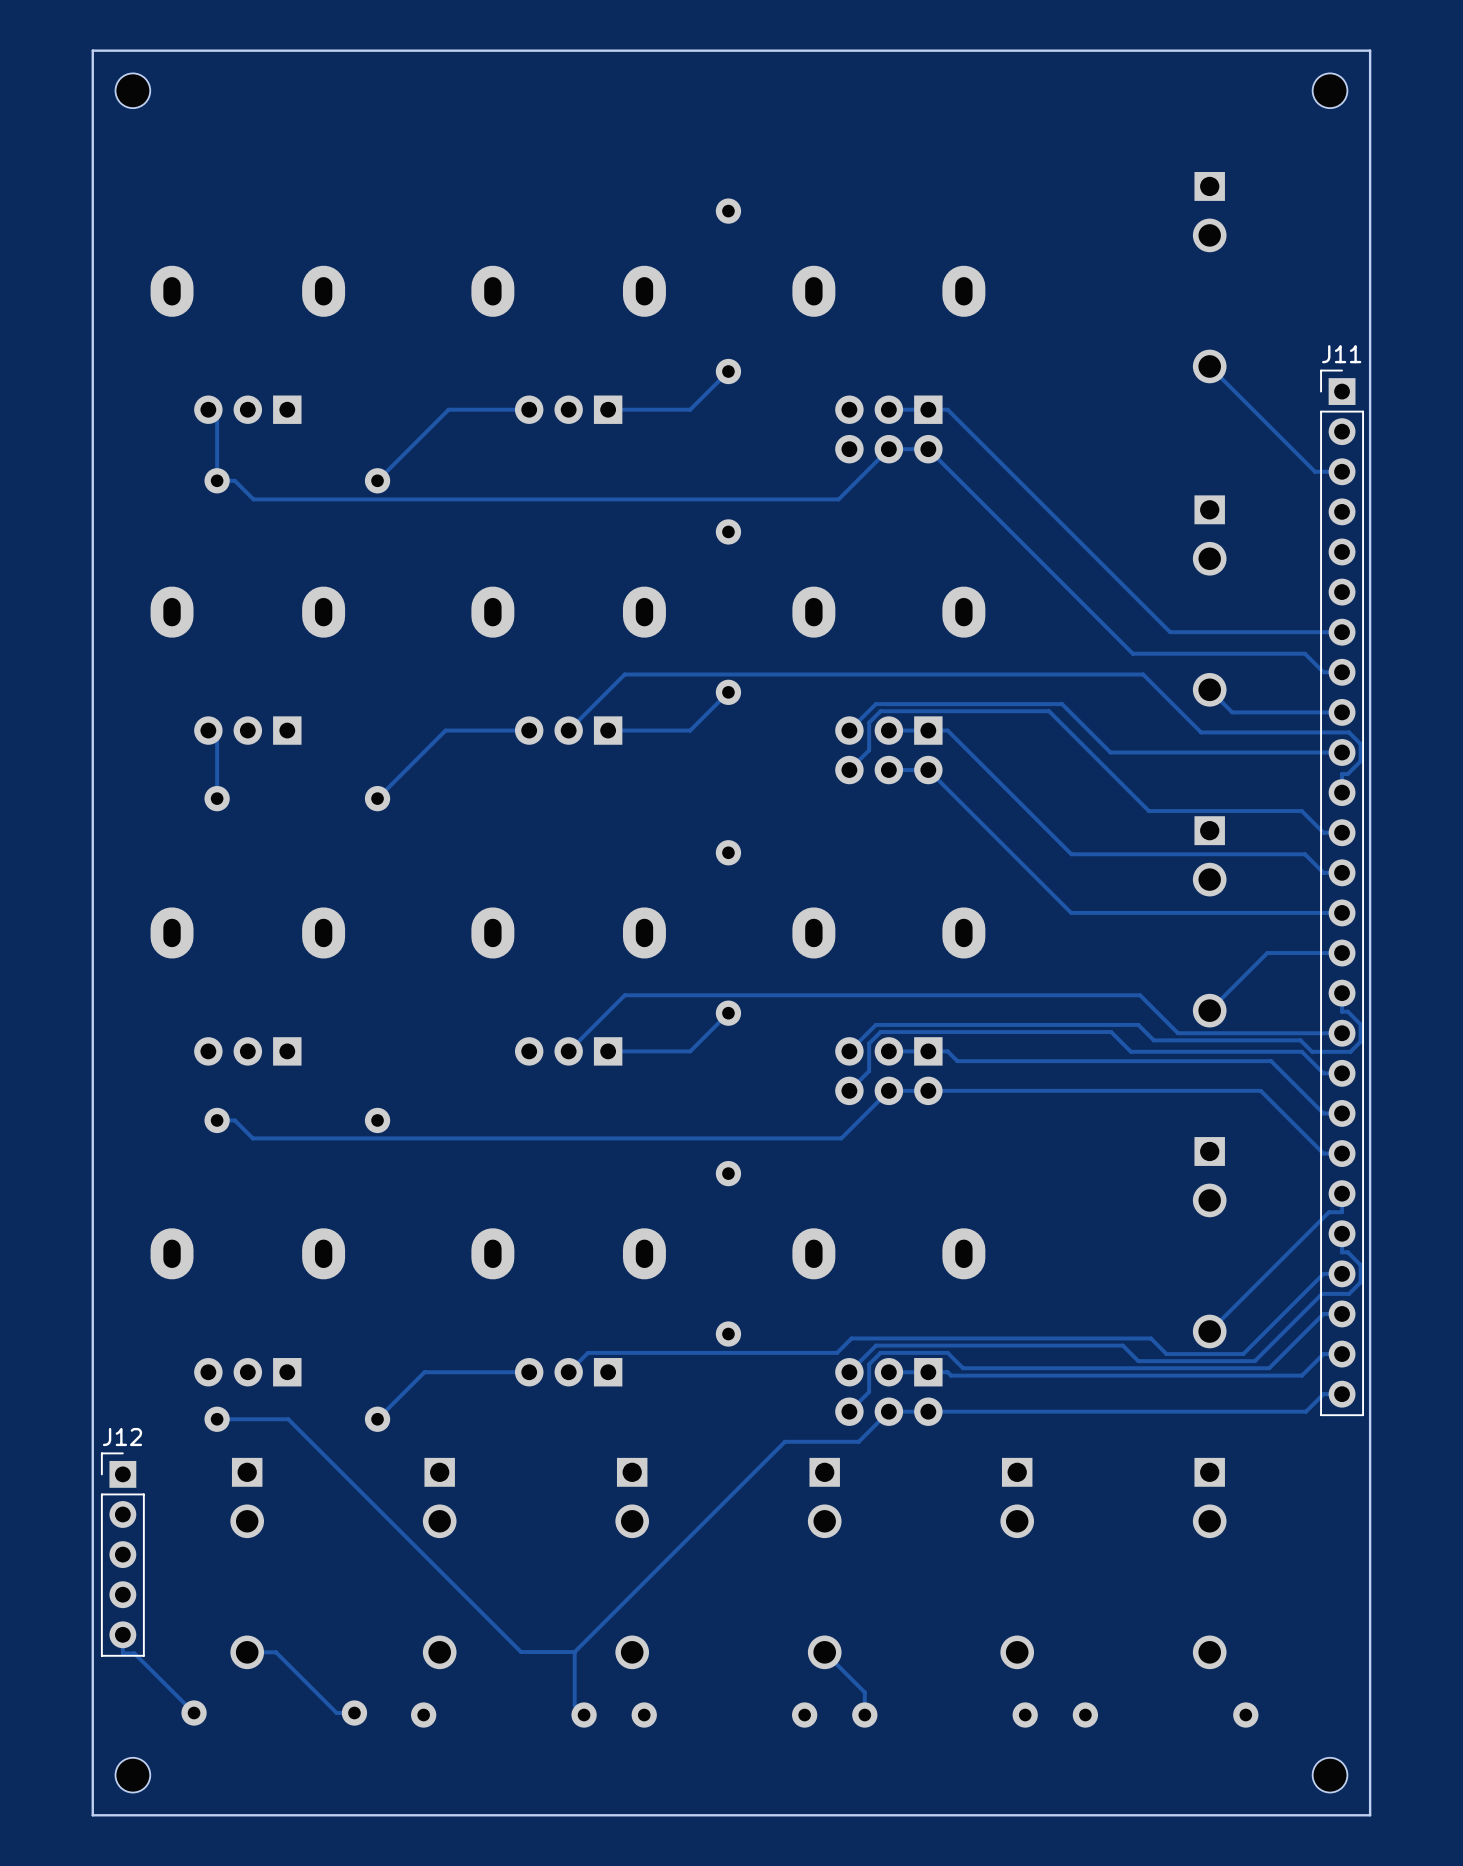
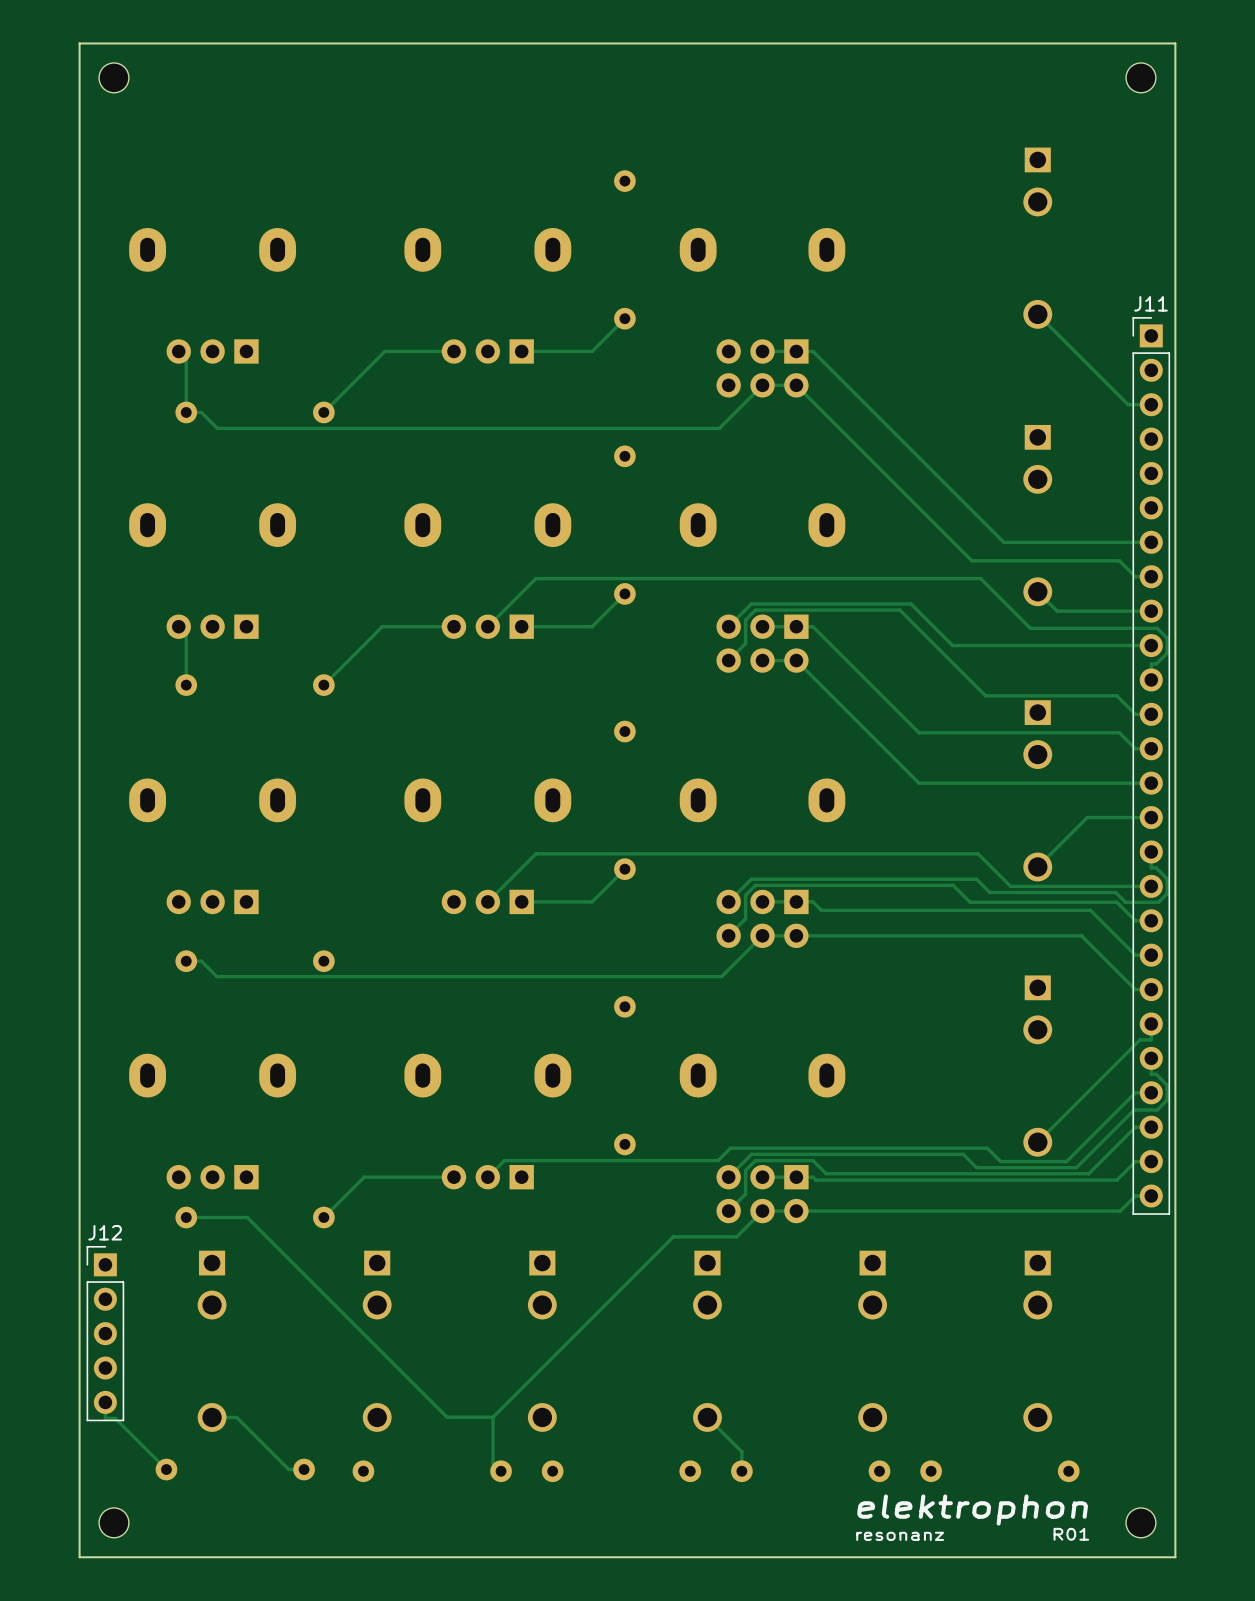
drawing: none -> [856, 1494, 1090, 1541]

